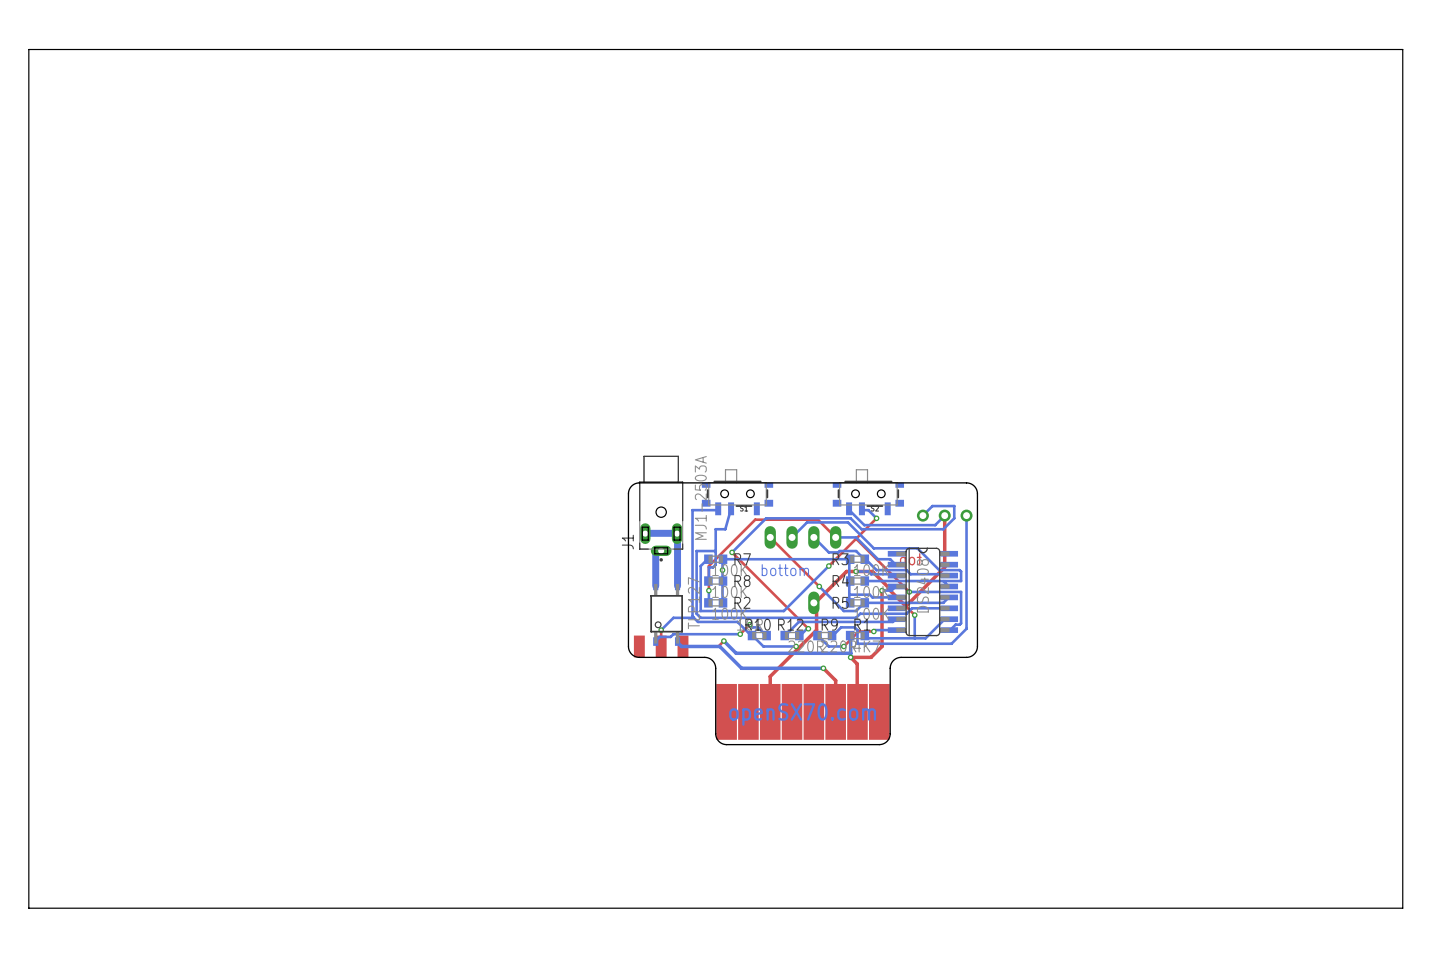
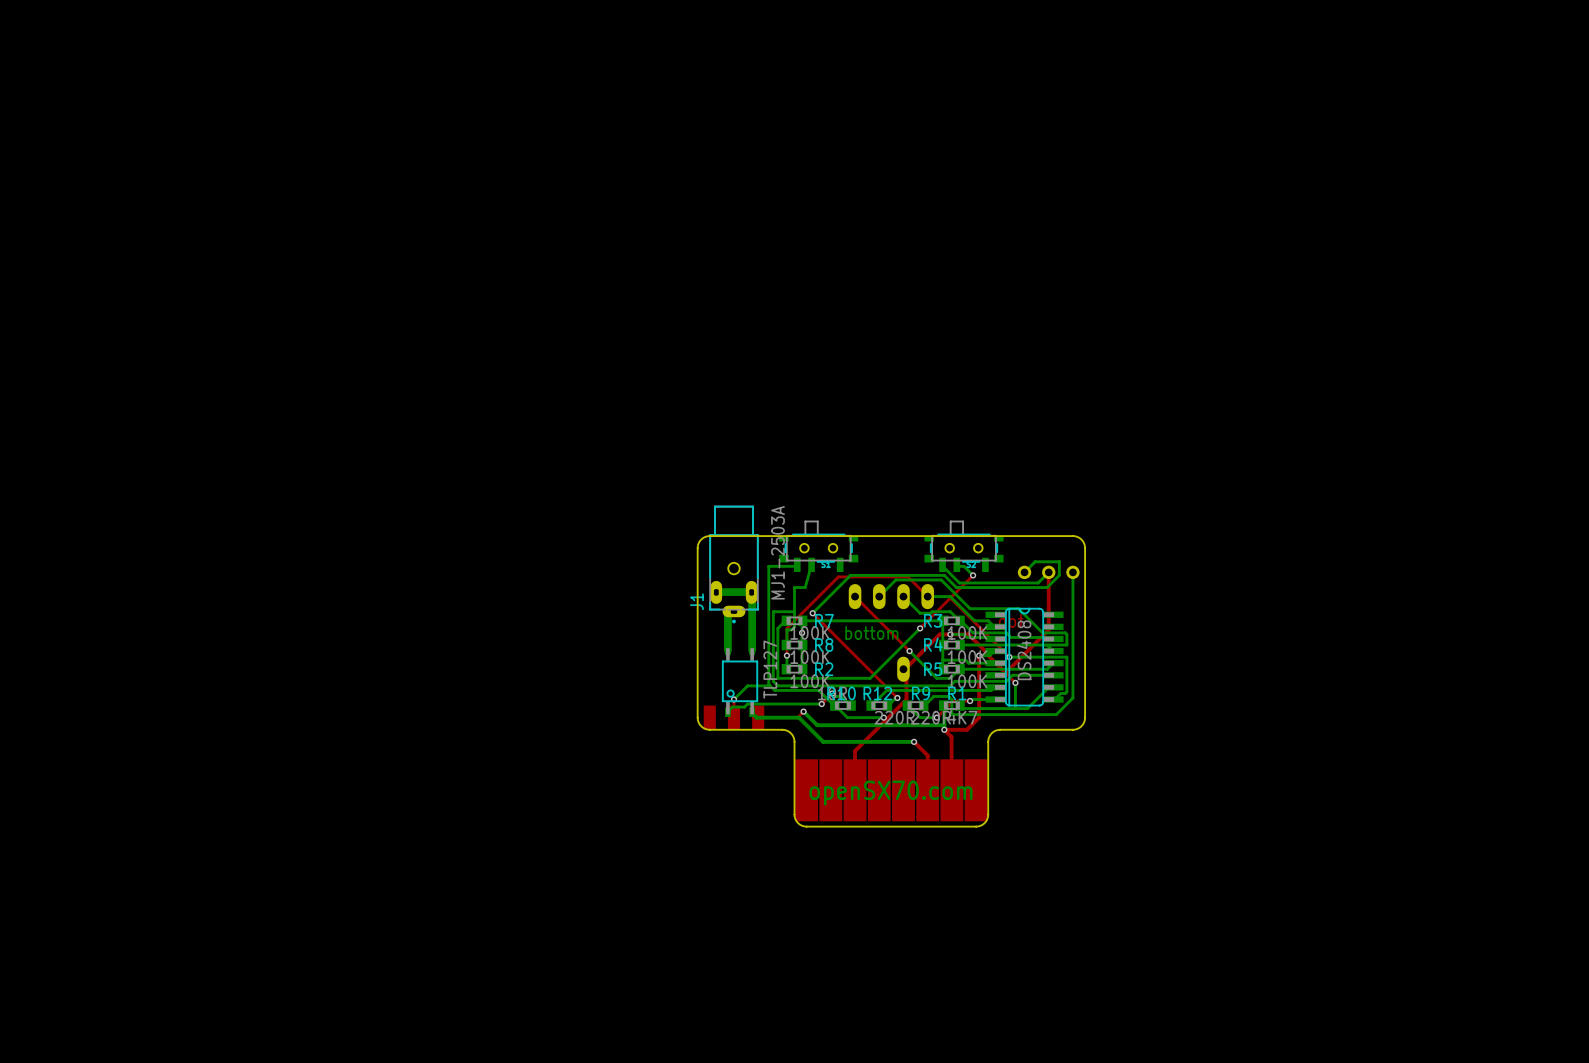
board edge: (1402, 49) (28, 49) (28, 908) (1402, 908) (1402, 49) -> none

